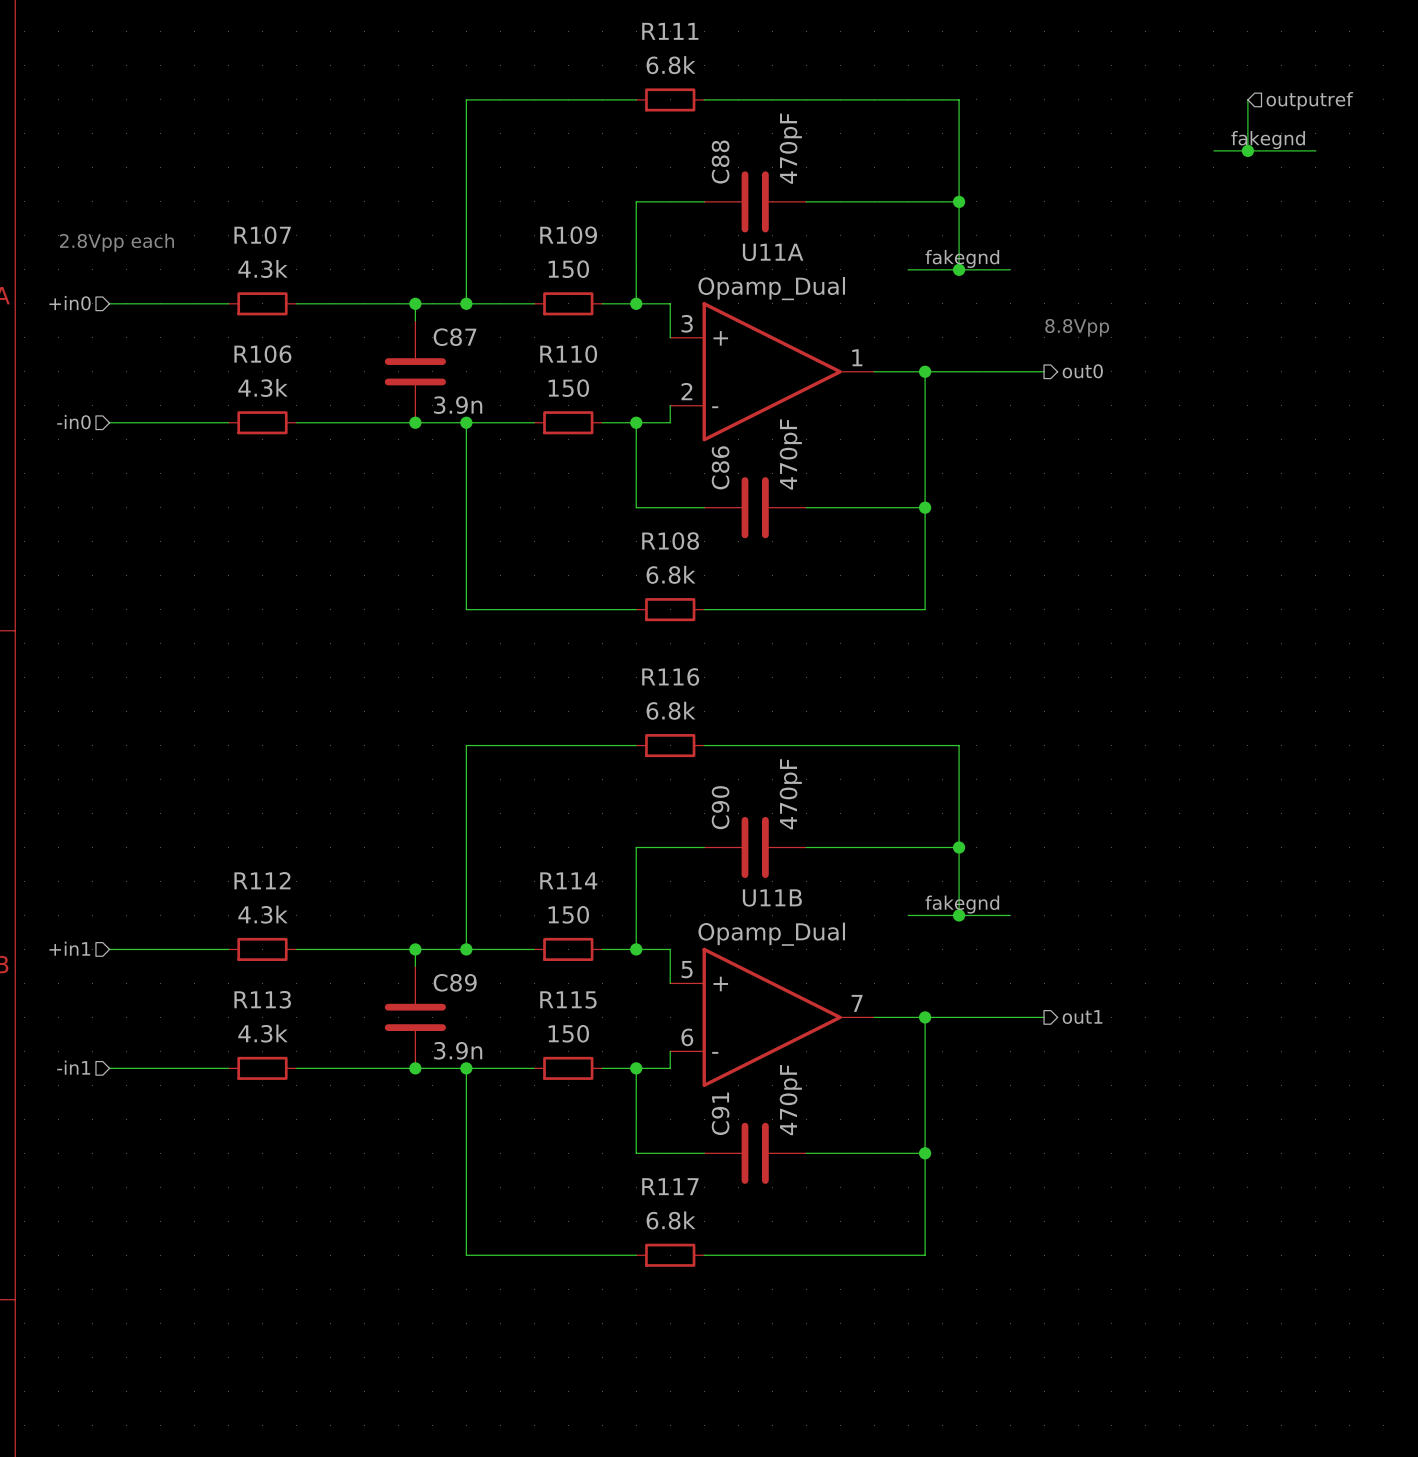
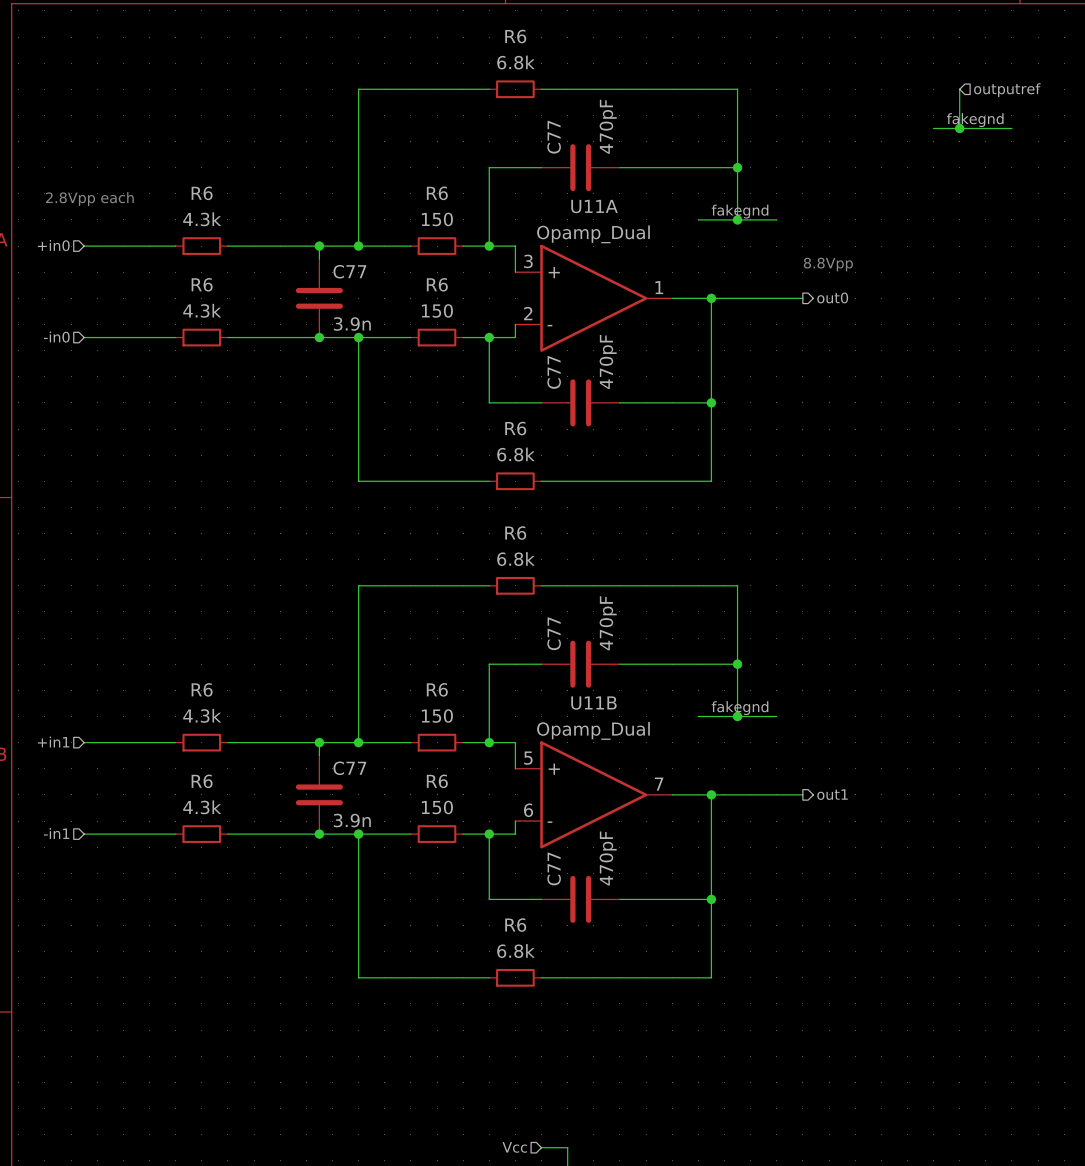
R111 name: R111 (670, 31) -> R6 (515, 36)
C88 name: C88 (720, 162) -> C77 (554, 137)
R107 name: R107 (262, 235) -> R6 (202, 193)
R109 name: R109 (568, 235) -> R6 (437, 193)
C87 name: C87 (455, 337) -> C77 (349, 271)
R106 name: R106 (262, 354) -> R6 (202, 284)
R110 name: R110 (568, 354) -> R6 (437, 284)
C86 name: C86 (720, 467) -> C77 (554, 372)
R108 name: R108 (670, 541) -> R6 (515, 428)
R116 name: R116 (670, 676) -> R6 (515, 533)
C90 name: C90 (720, 807) -> C77 (554, 633)
R112 name: R112 (262, 880) -> R6 (202, 689)
R114 name: R114 (568, 880) -> R6 (437, 689)
C89 name: C89 (455, 982) -> C77 (349, 768)
R113 name: R113 (262, 999) -> R6 (202, 781)
R115 name: R115 (568, 999) -> R6 (437, 781)
C91 name: C91 (720, 1113) -> C77 (554, 868)
R117 name: R117 (670, 1186) -> R6 (515, 925)

